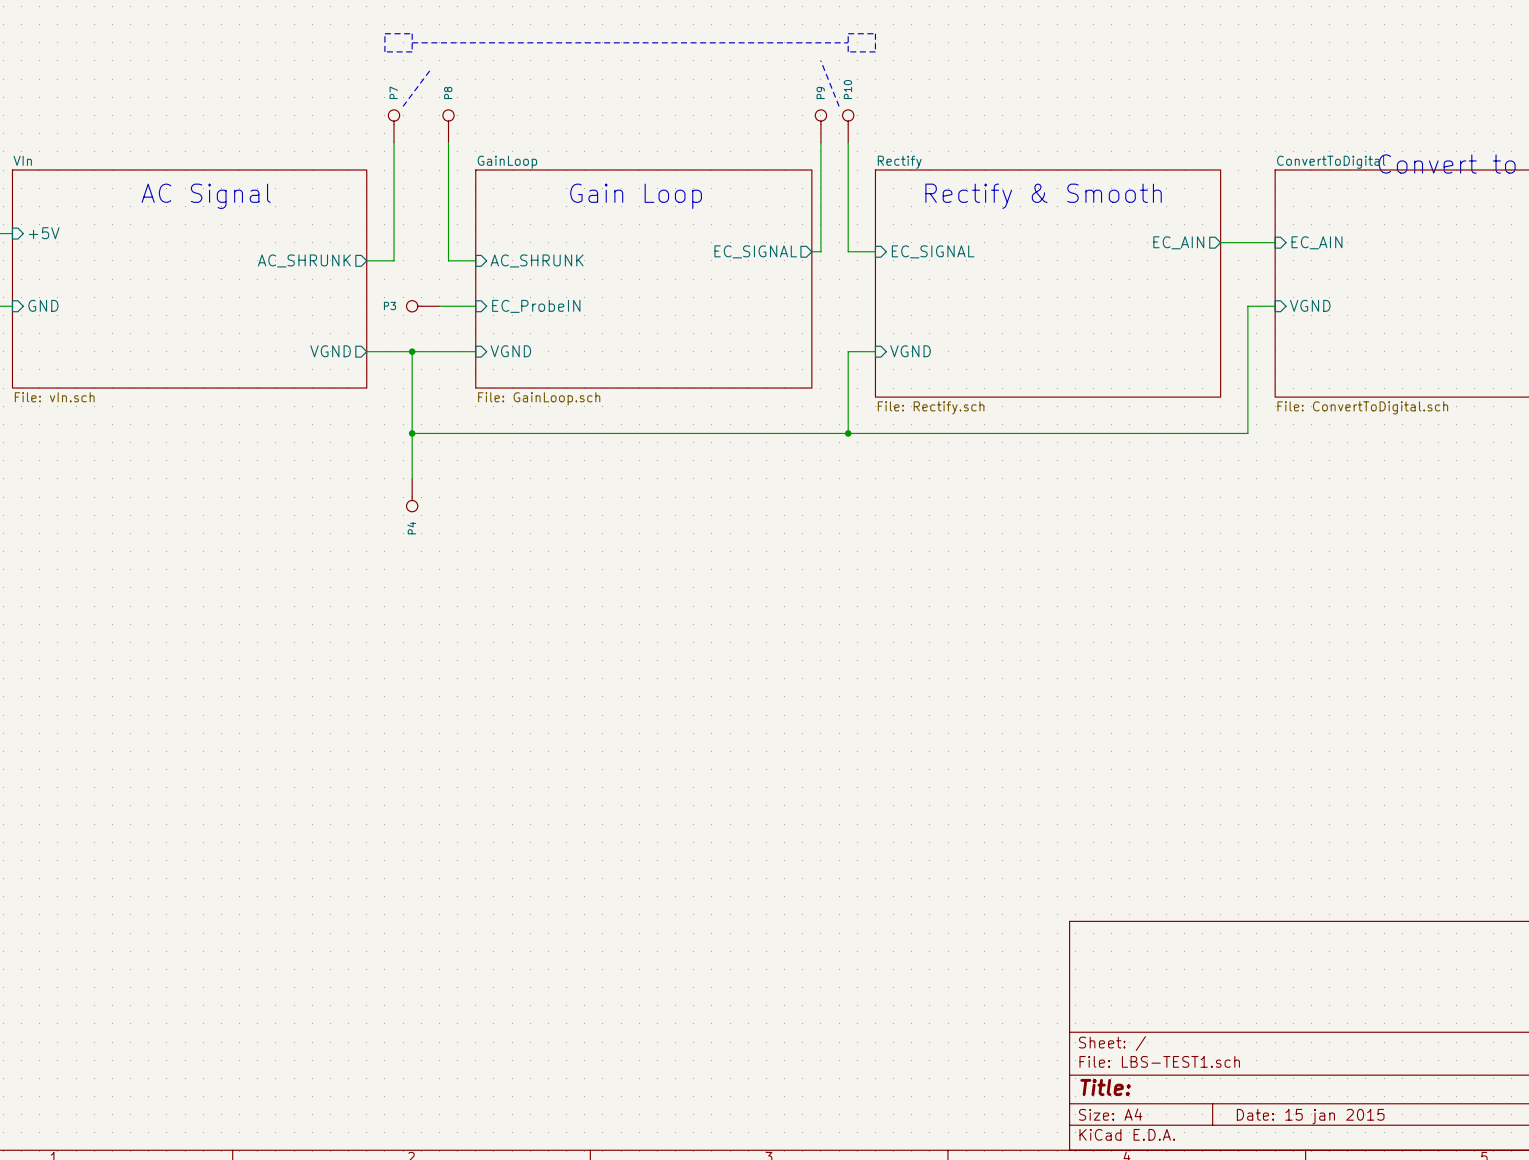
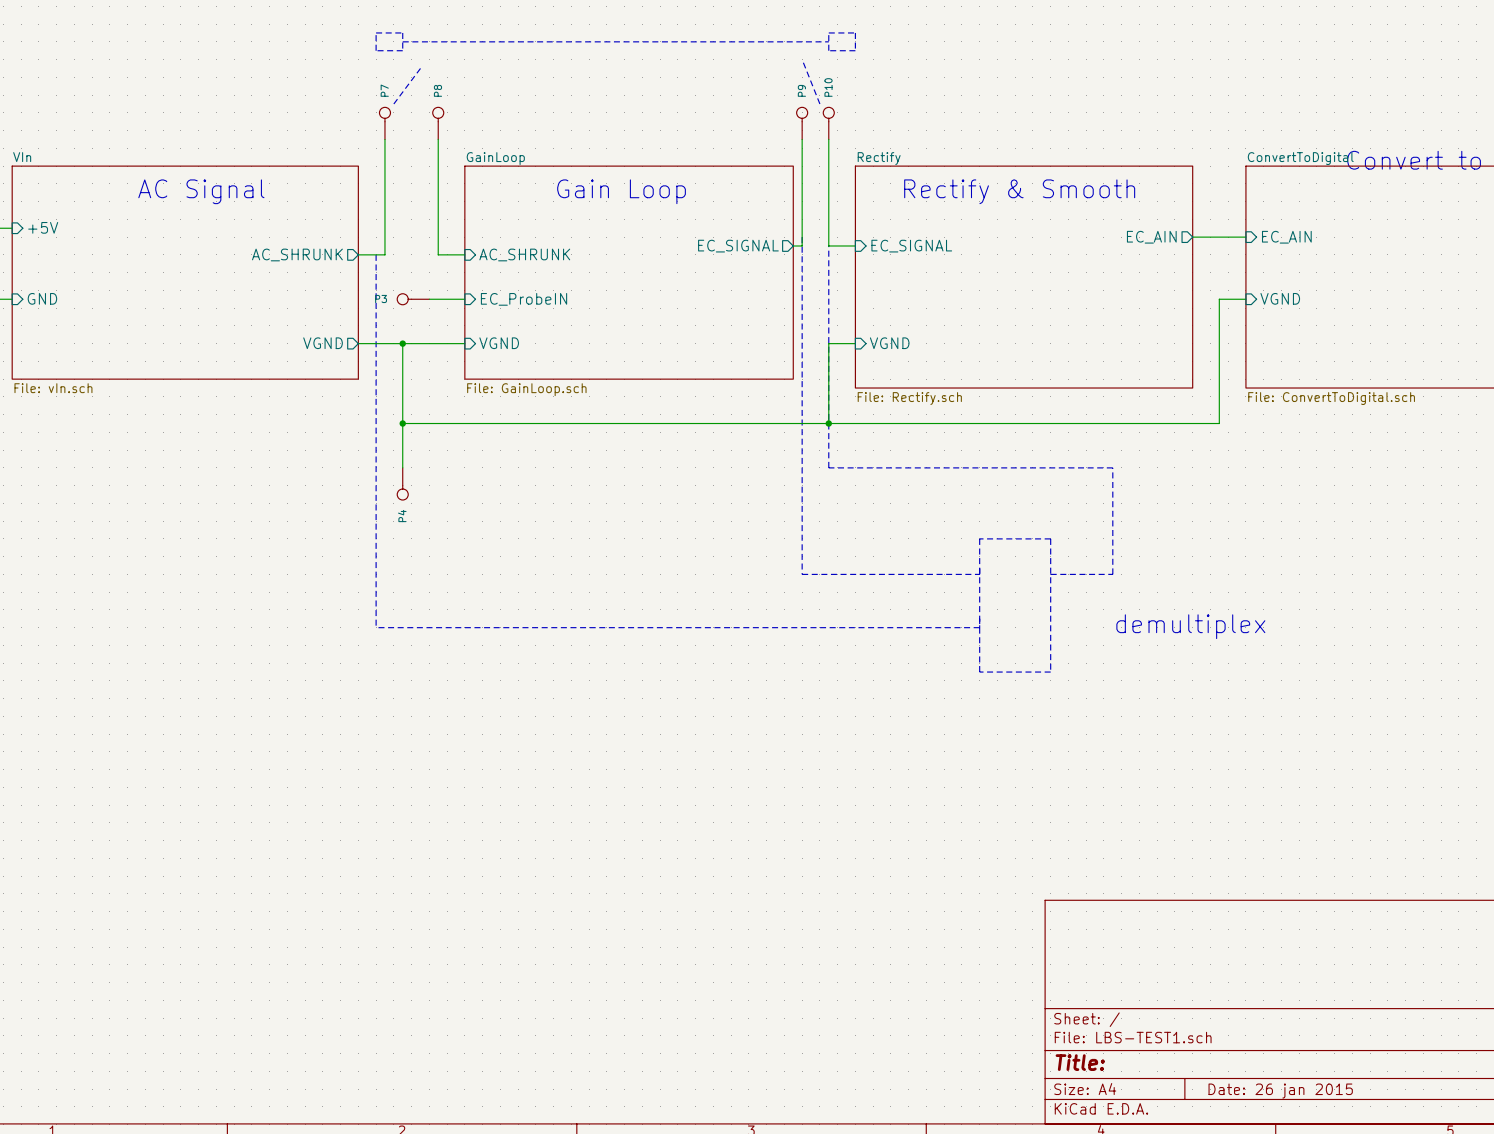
line: none -> (802, 237) (802, 574) (979, 574)
line: none -> (828, 245) (828, 467) (1112, 467) (1112, 574) (1050, 574)
line: none -> (376, 254) (376, 627) (979, 627)
line: none -> (979, 538) (979, 672) (1050, 672) (1050, 538) (979, 538)
text: none -> demultiplex (1190, 626)
title block: Date: 15 jan 2015 (1310, 1116) -> Date: 26 jan 2015 (1280, 1091)

